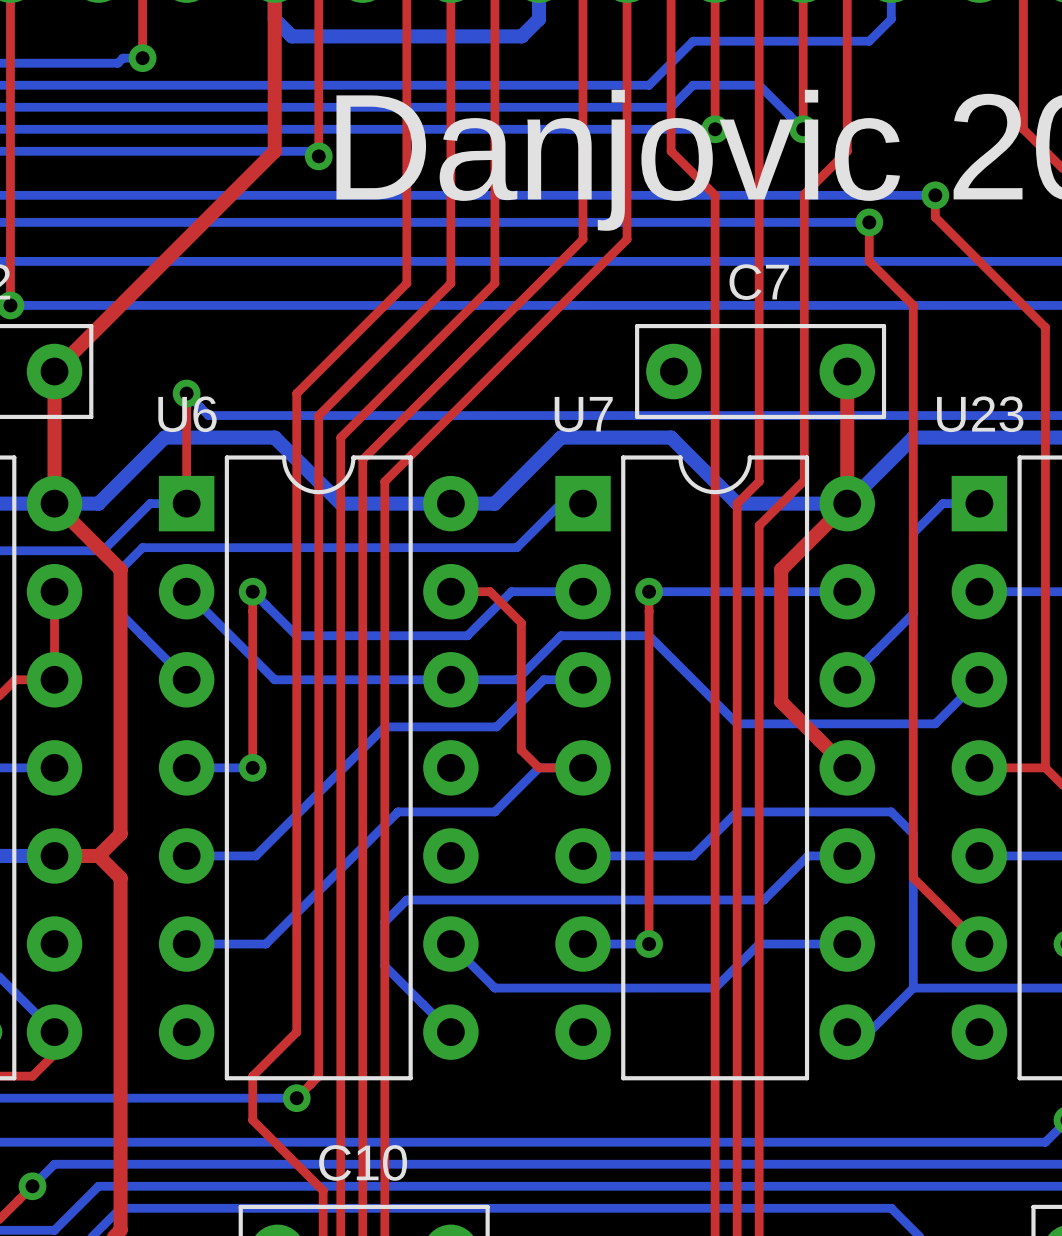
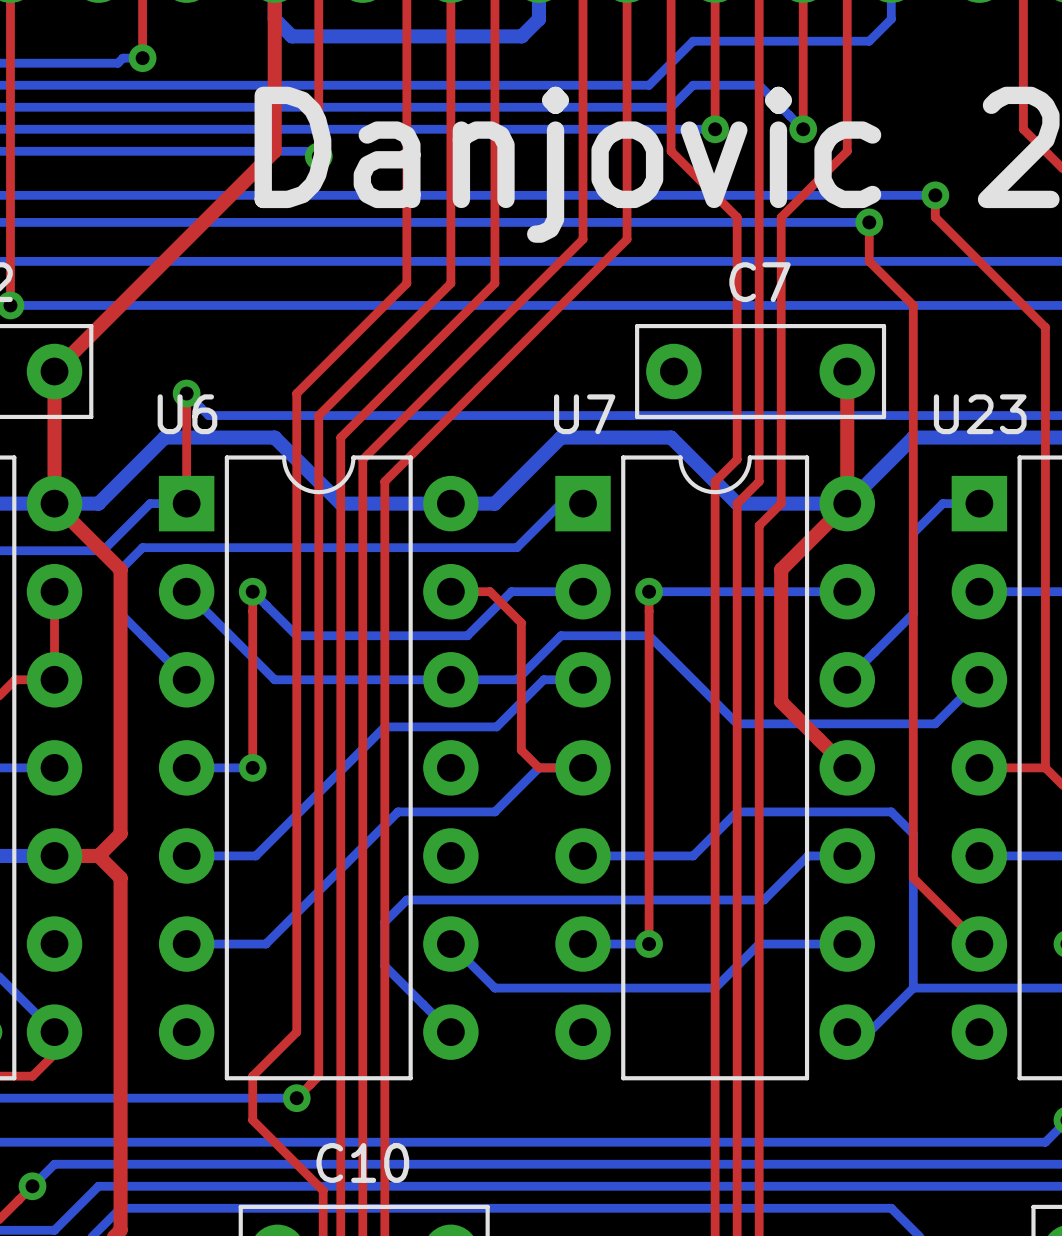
top track: (804, 194) (804, 480) (781, 503) -> (804, 194) (781, 217) (781, 503)
top track: (715, 195) (715, 481) -> (715, 195) (737, 217) (737, 459) (715, 481)

